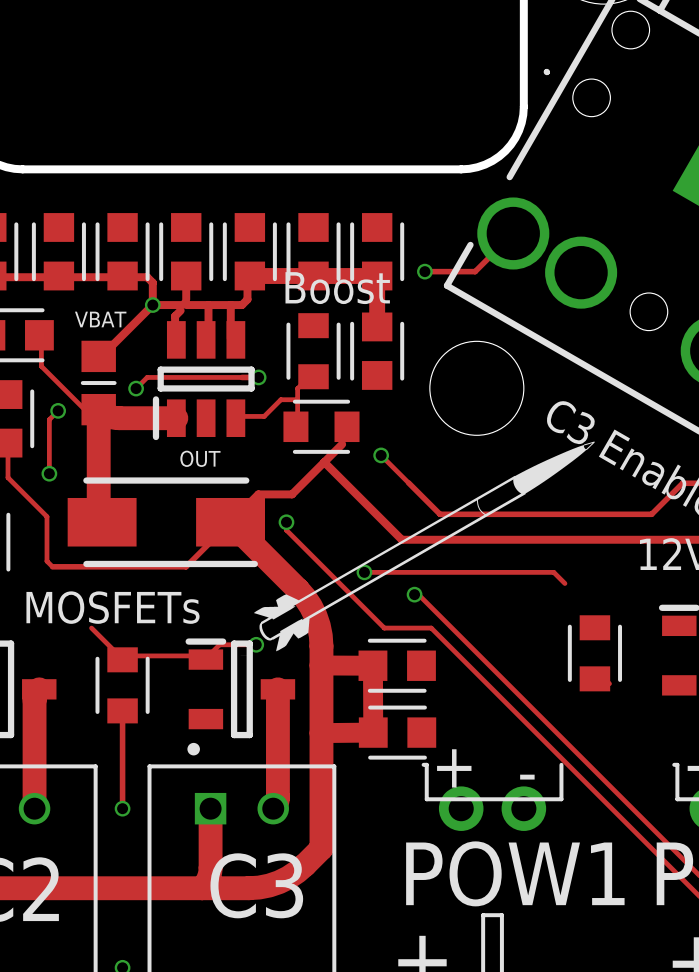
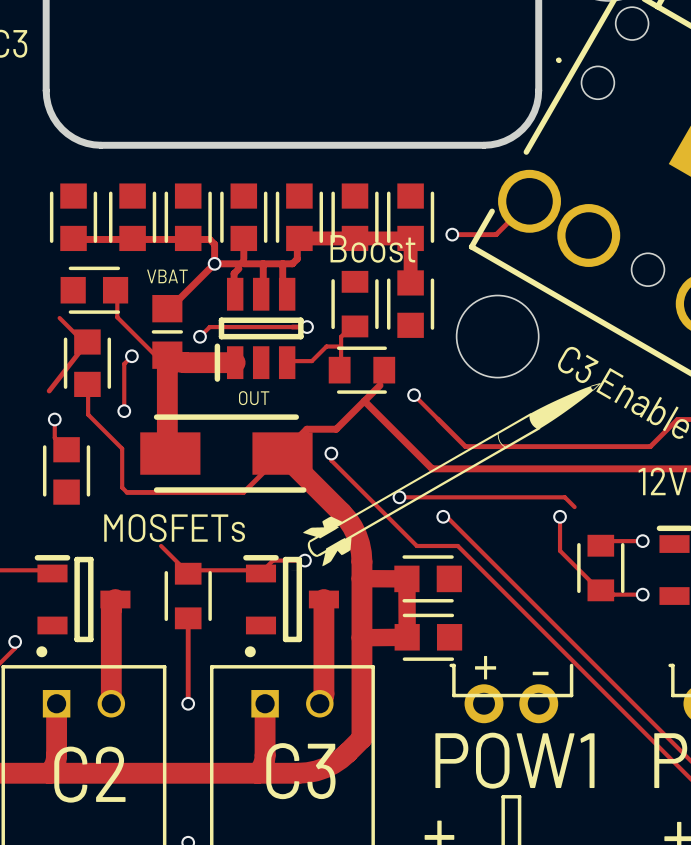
track: none -> (560, 516) (560, 550) (594, 584) (603, 584) (608, 589)
via: none -> (560, 516)
track: none -> (642, 541) (605, 542)
via: none -> (642, 541)
track: none -> (613, 594) (642, 594)
via: none -> (642, 594)

